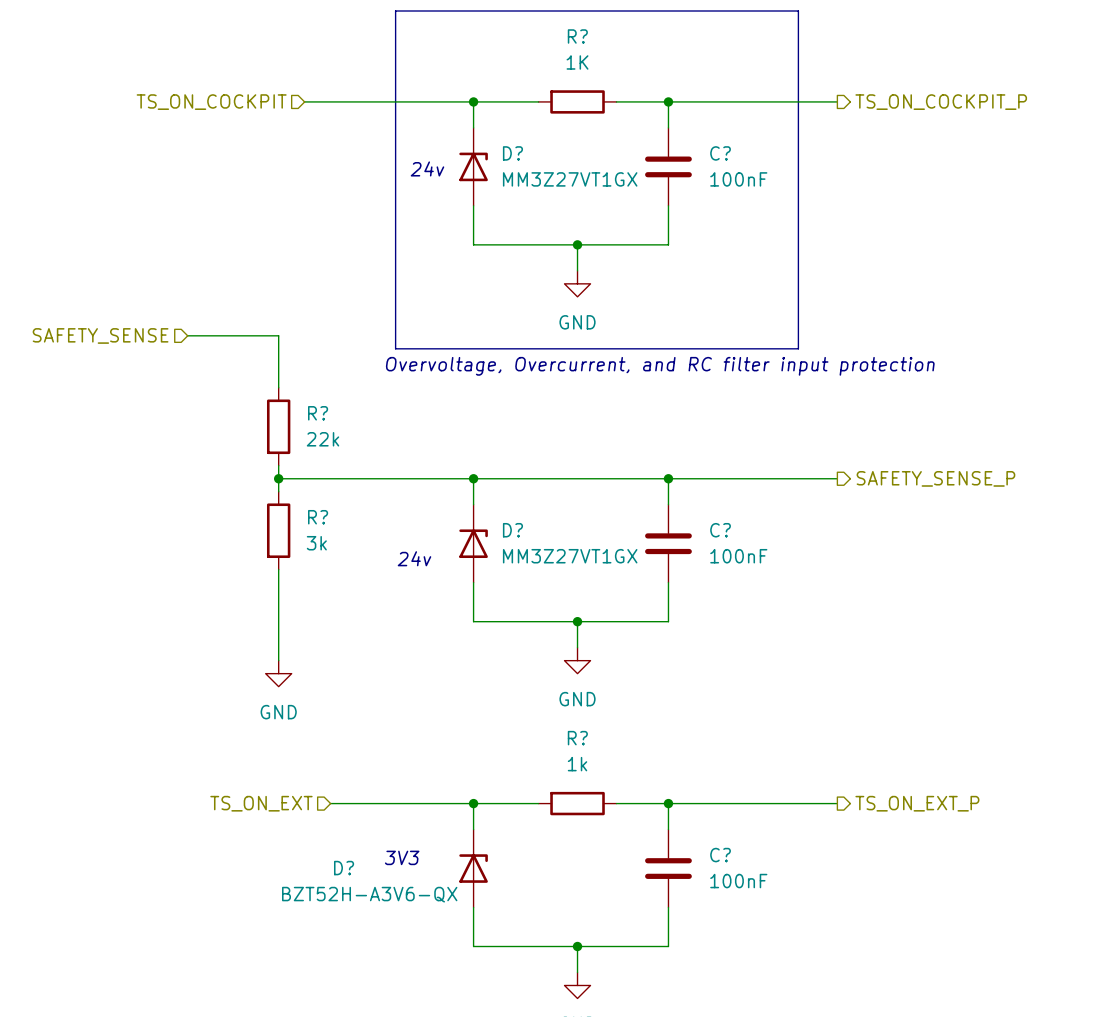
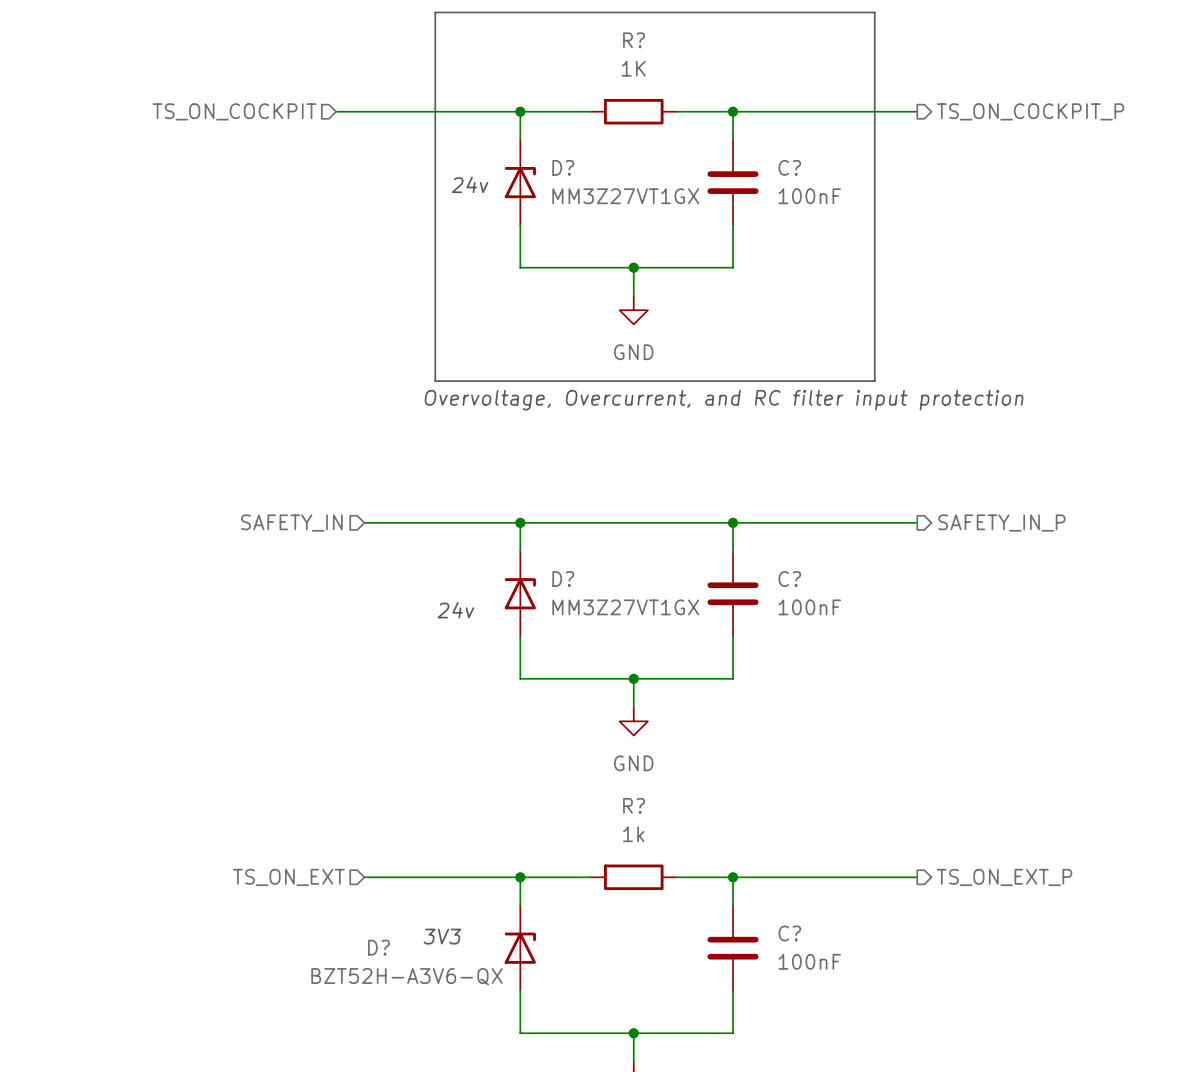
hierarchical label: SAFETY_SENSE (100, 335) -> none
wire: (187, 335) (278, 335) (278, 387) -> none
R?: 22k (278, 426) -> none
wire: (278, 465) (278, 491) -> none
hierarchical label: none -> SAFETY_IN (291, 523)
wire: (278, 478) (330, 478) -> none
junction: (278, 478) -> none
hierarchical label: SAFETY_SENSE_P (935, 478) -> SAFETY_IN_P (1001, 523)
R?: 3k (278, 530) -> none
wire: (278, 569) (278, 660) -> none
power symbol: GND (278, 673) -> none

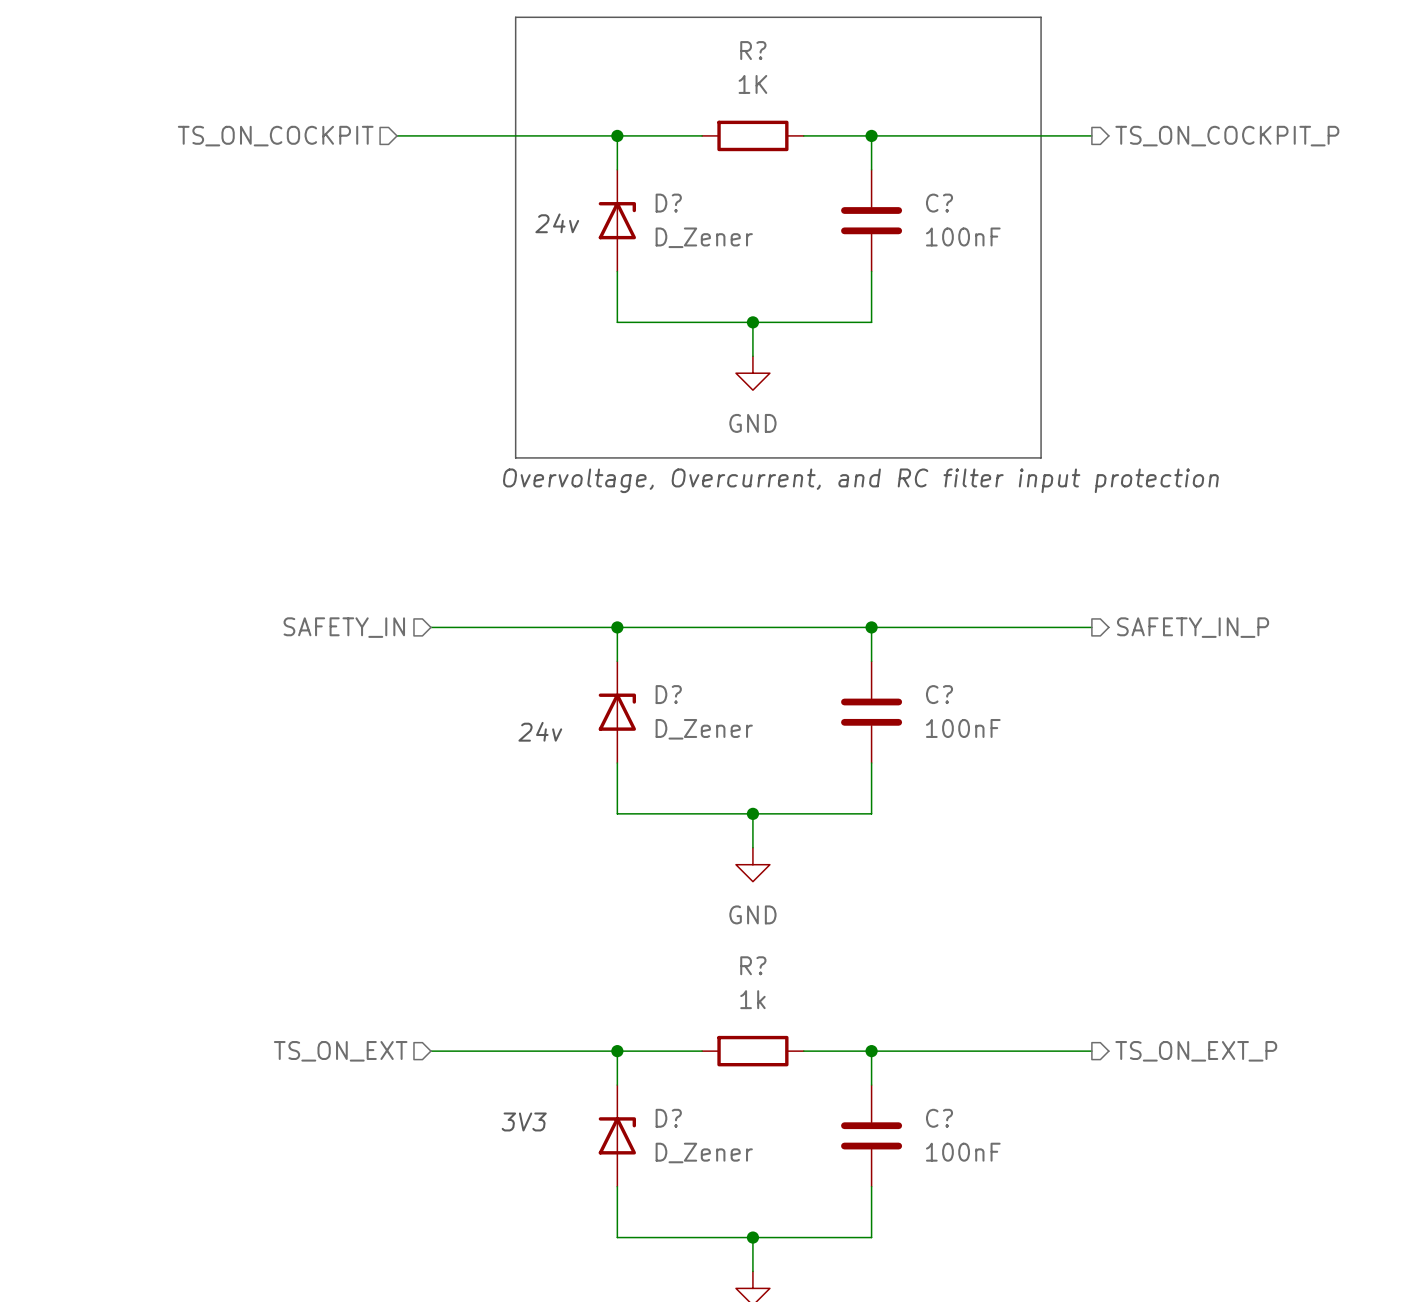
D? value: MM3Z27VT1GX (625, 196) -> D_Zener (704, 237)
D? value: MM3Z27VT1GX (625, 607) -> D_Zener (704, 729)
D? name position: D? (379, 947) -> D? (668, 1118)
D? value: BZT52H-A3V6-QX (407, 976) -> D_Zener (704, 1152)

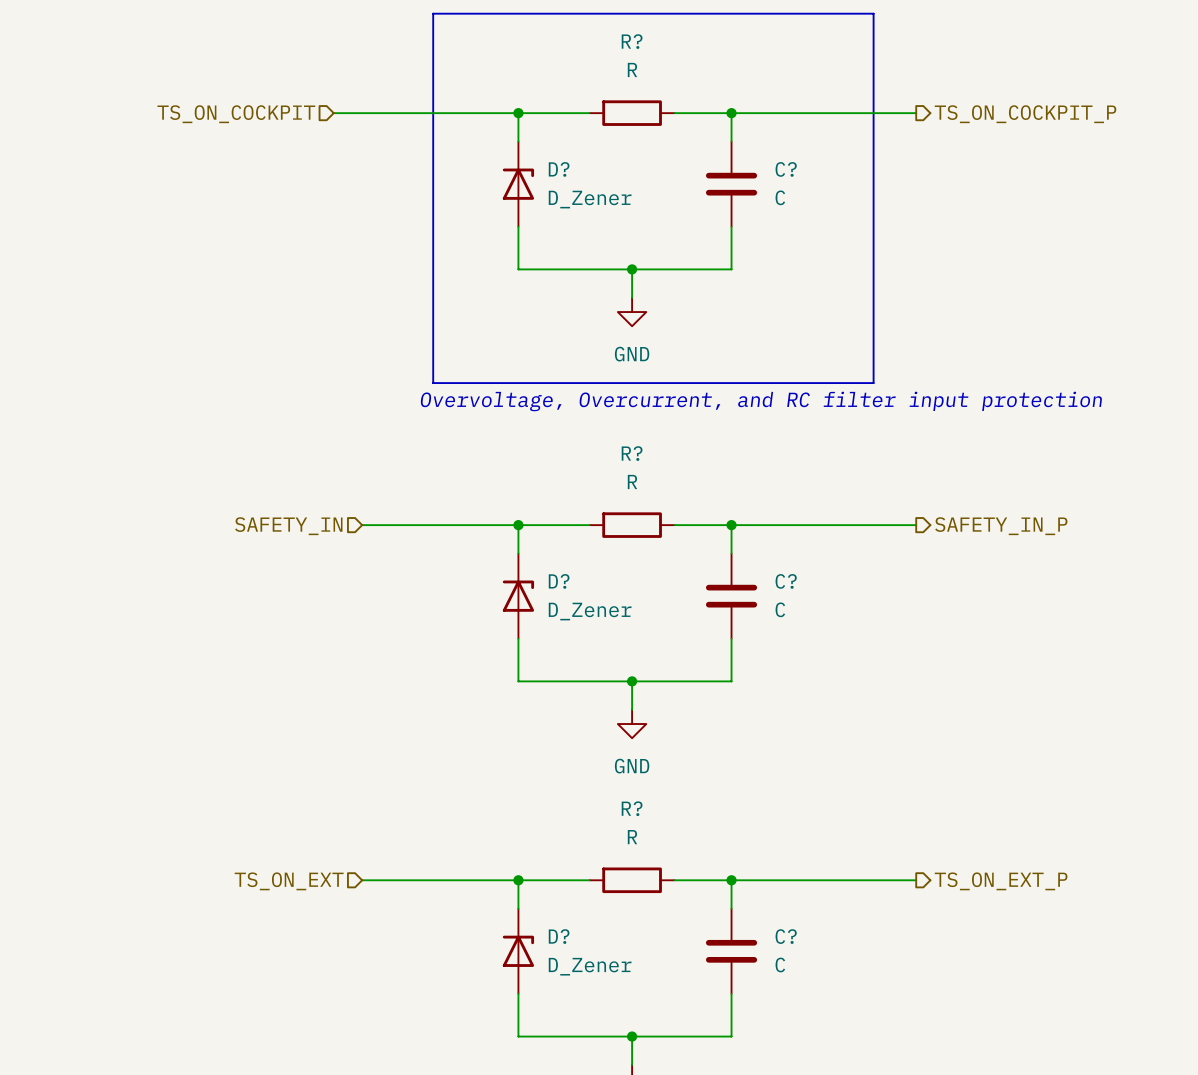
R? value: 1K (752, 84) -> R (632, 69)
text: 24v (557, 223) -> none
C? value: 100nF (963, 236) -> C (780, 197)
wire: (702, 627) (803, 627) -> none
R?: none -> R (632, 525)
C? value: 100nF (963, 728) -> C (780, 609)
text: 24v (540, 731) -> none
R? value: 1k (752, 999) -> R (632, 837)
text: 3V3 (524, 1121) -> none
C? value: 100nF (963, 1152) -> C (780, 964)

